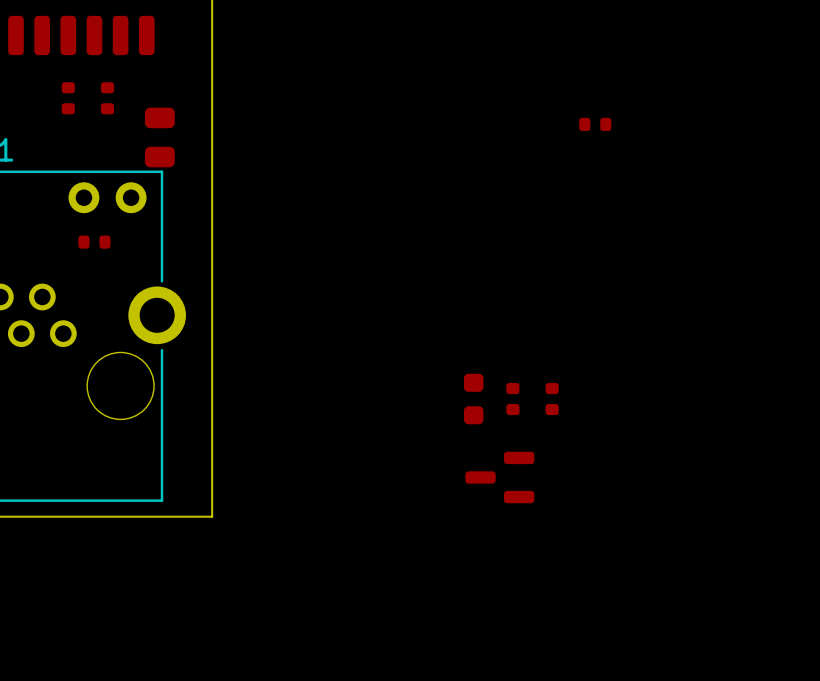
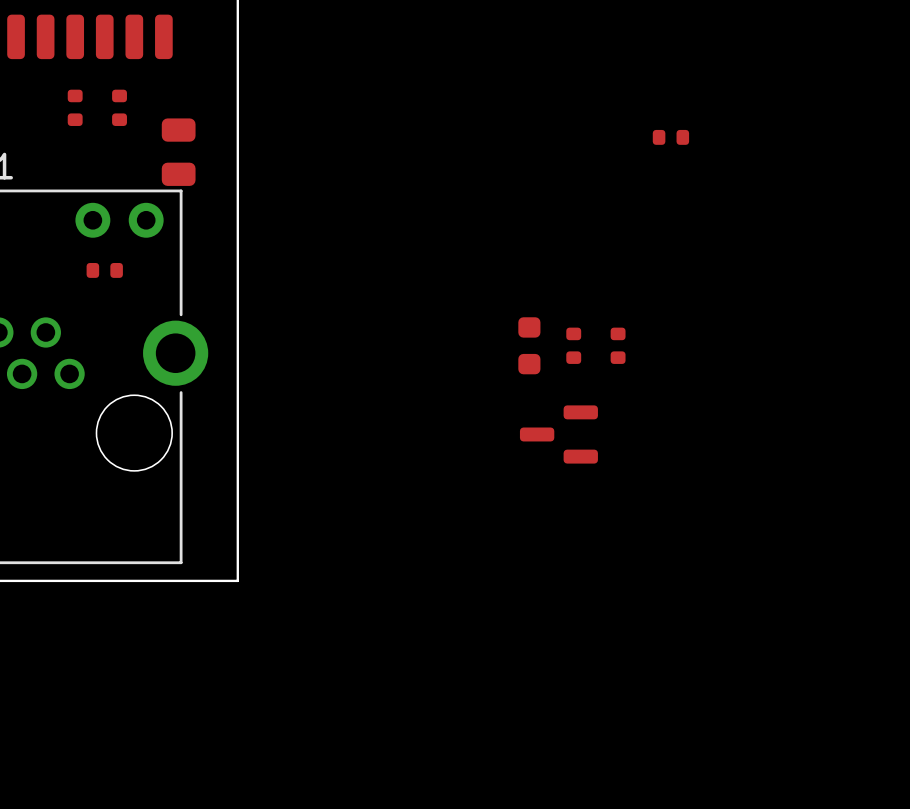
part: none -> (573, 345)
part: none -> (618, 345)
part position: (473, 399) -> (529, 345)
part: (512, 399) -> none
part: (552, 399) -> none
part position: (499, 477) -> (558, 434)

